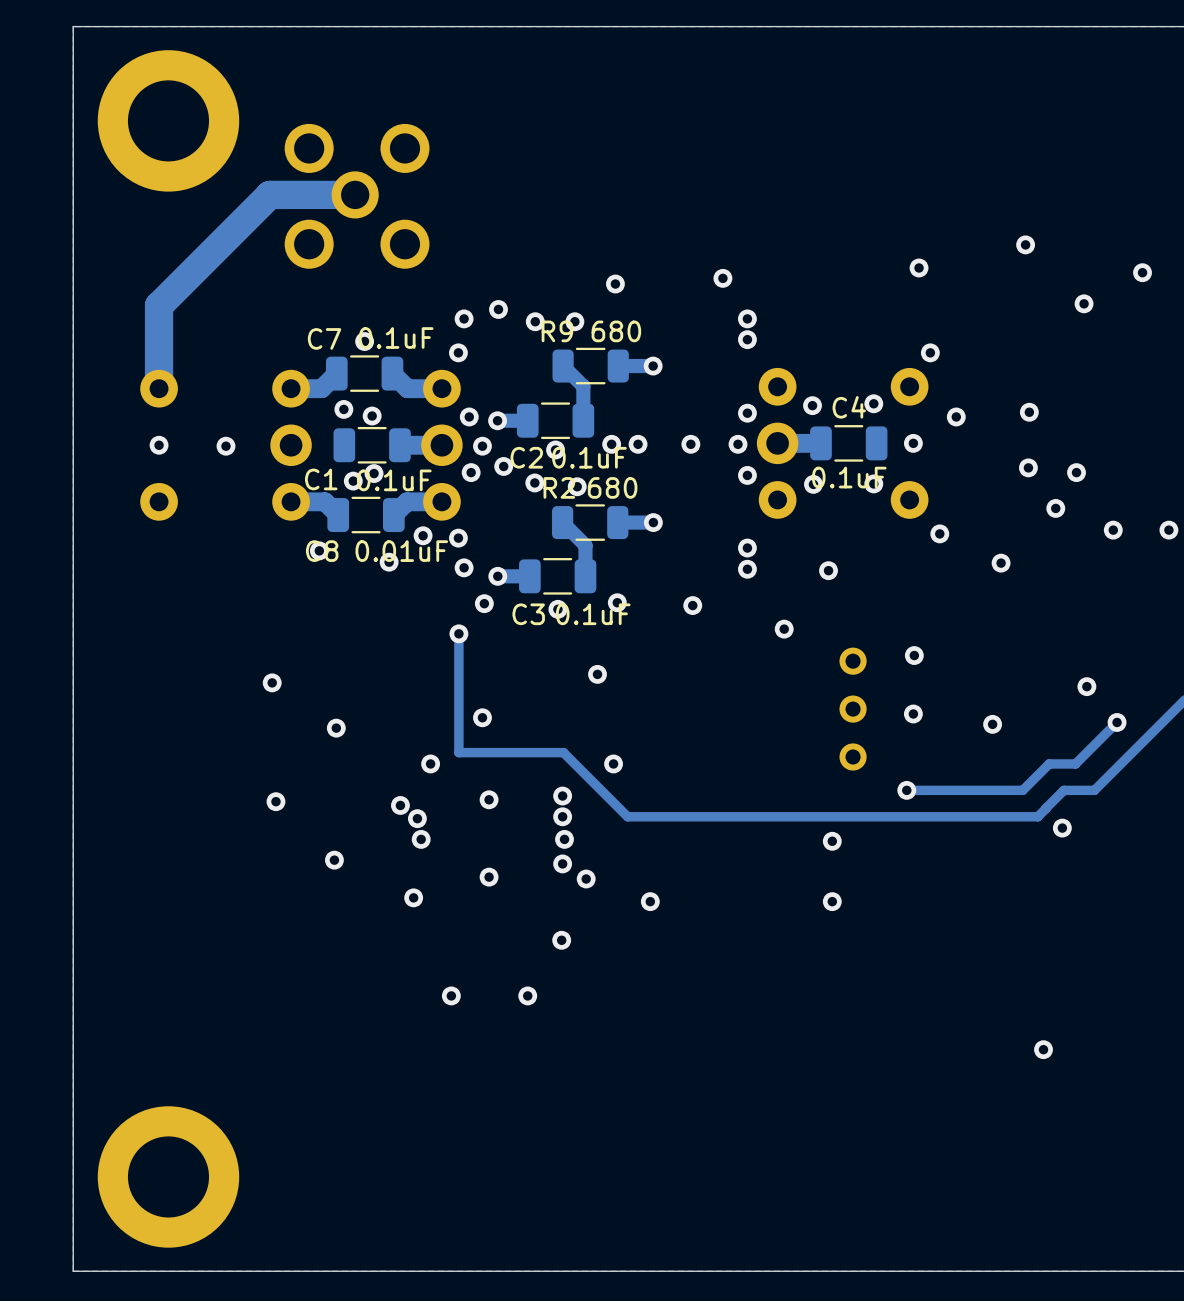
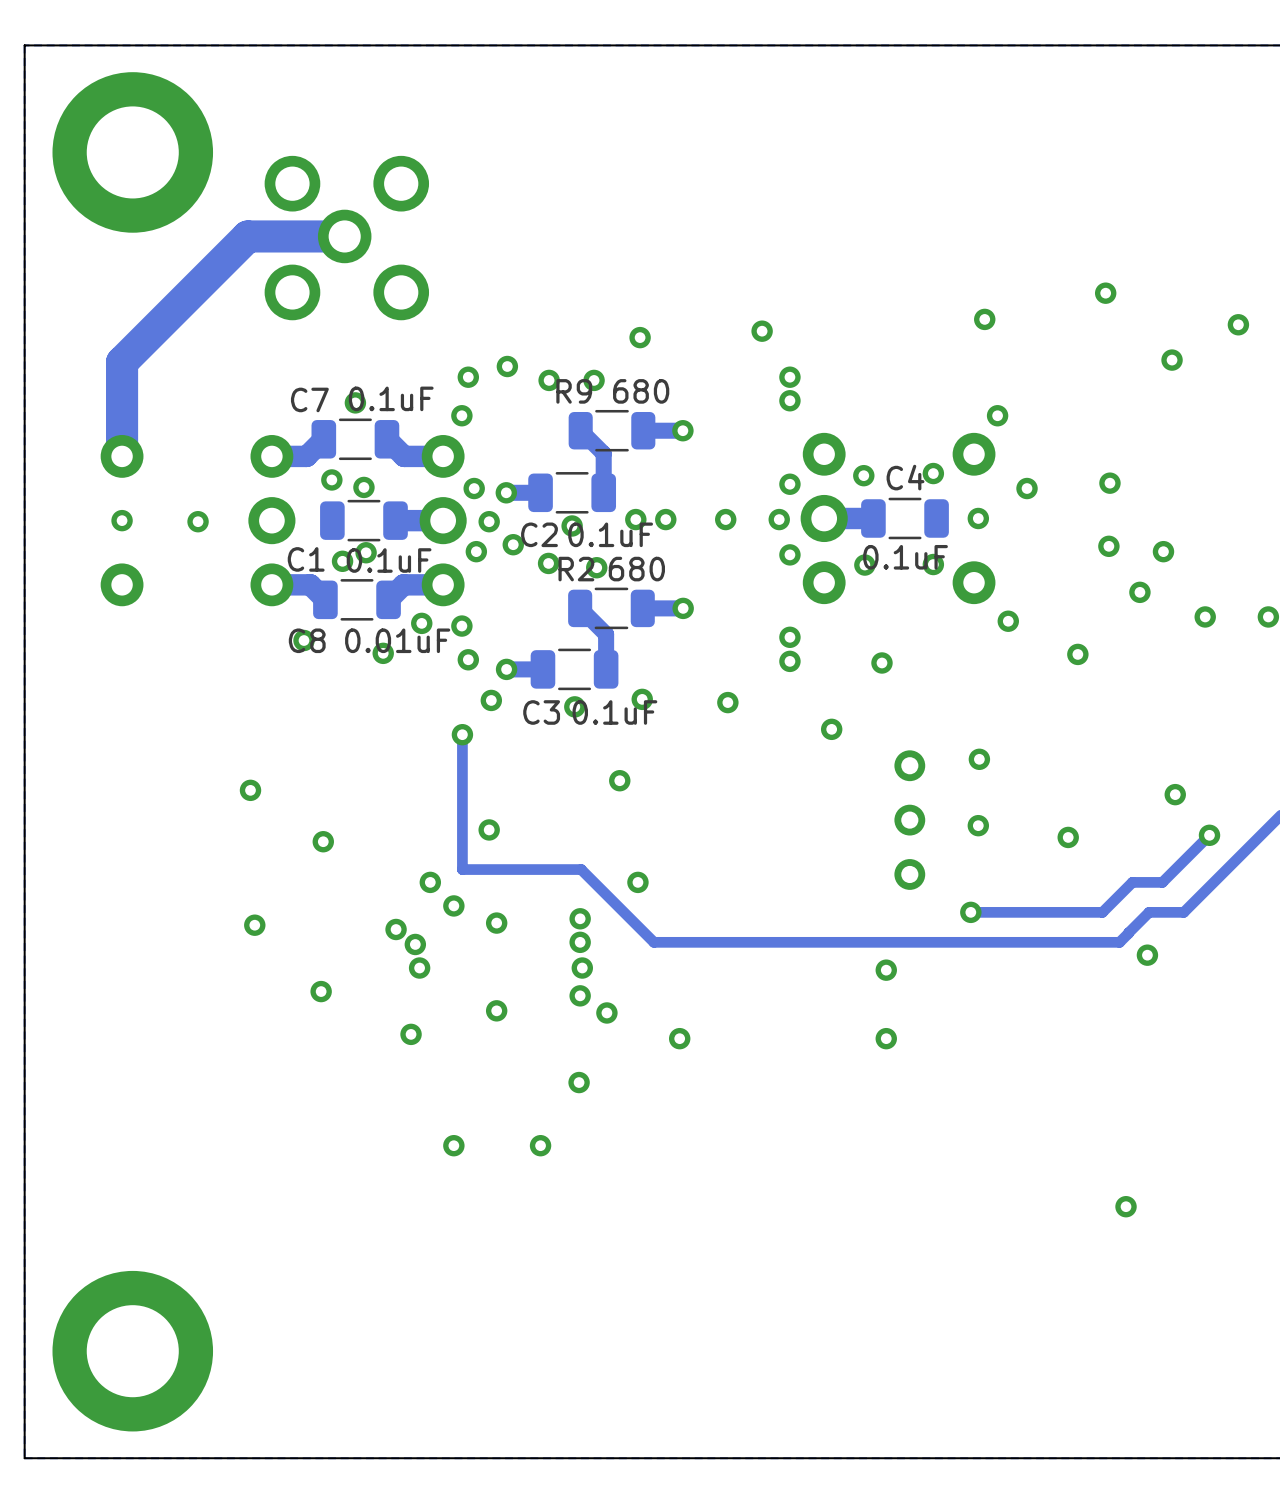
via: none -> (453, 905)

